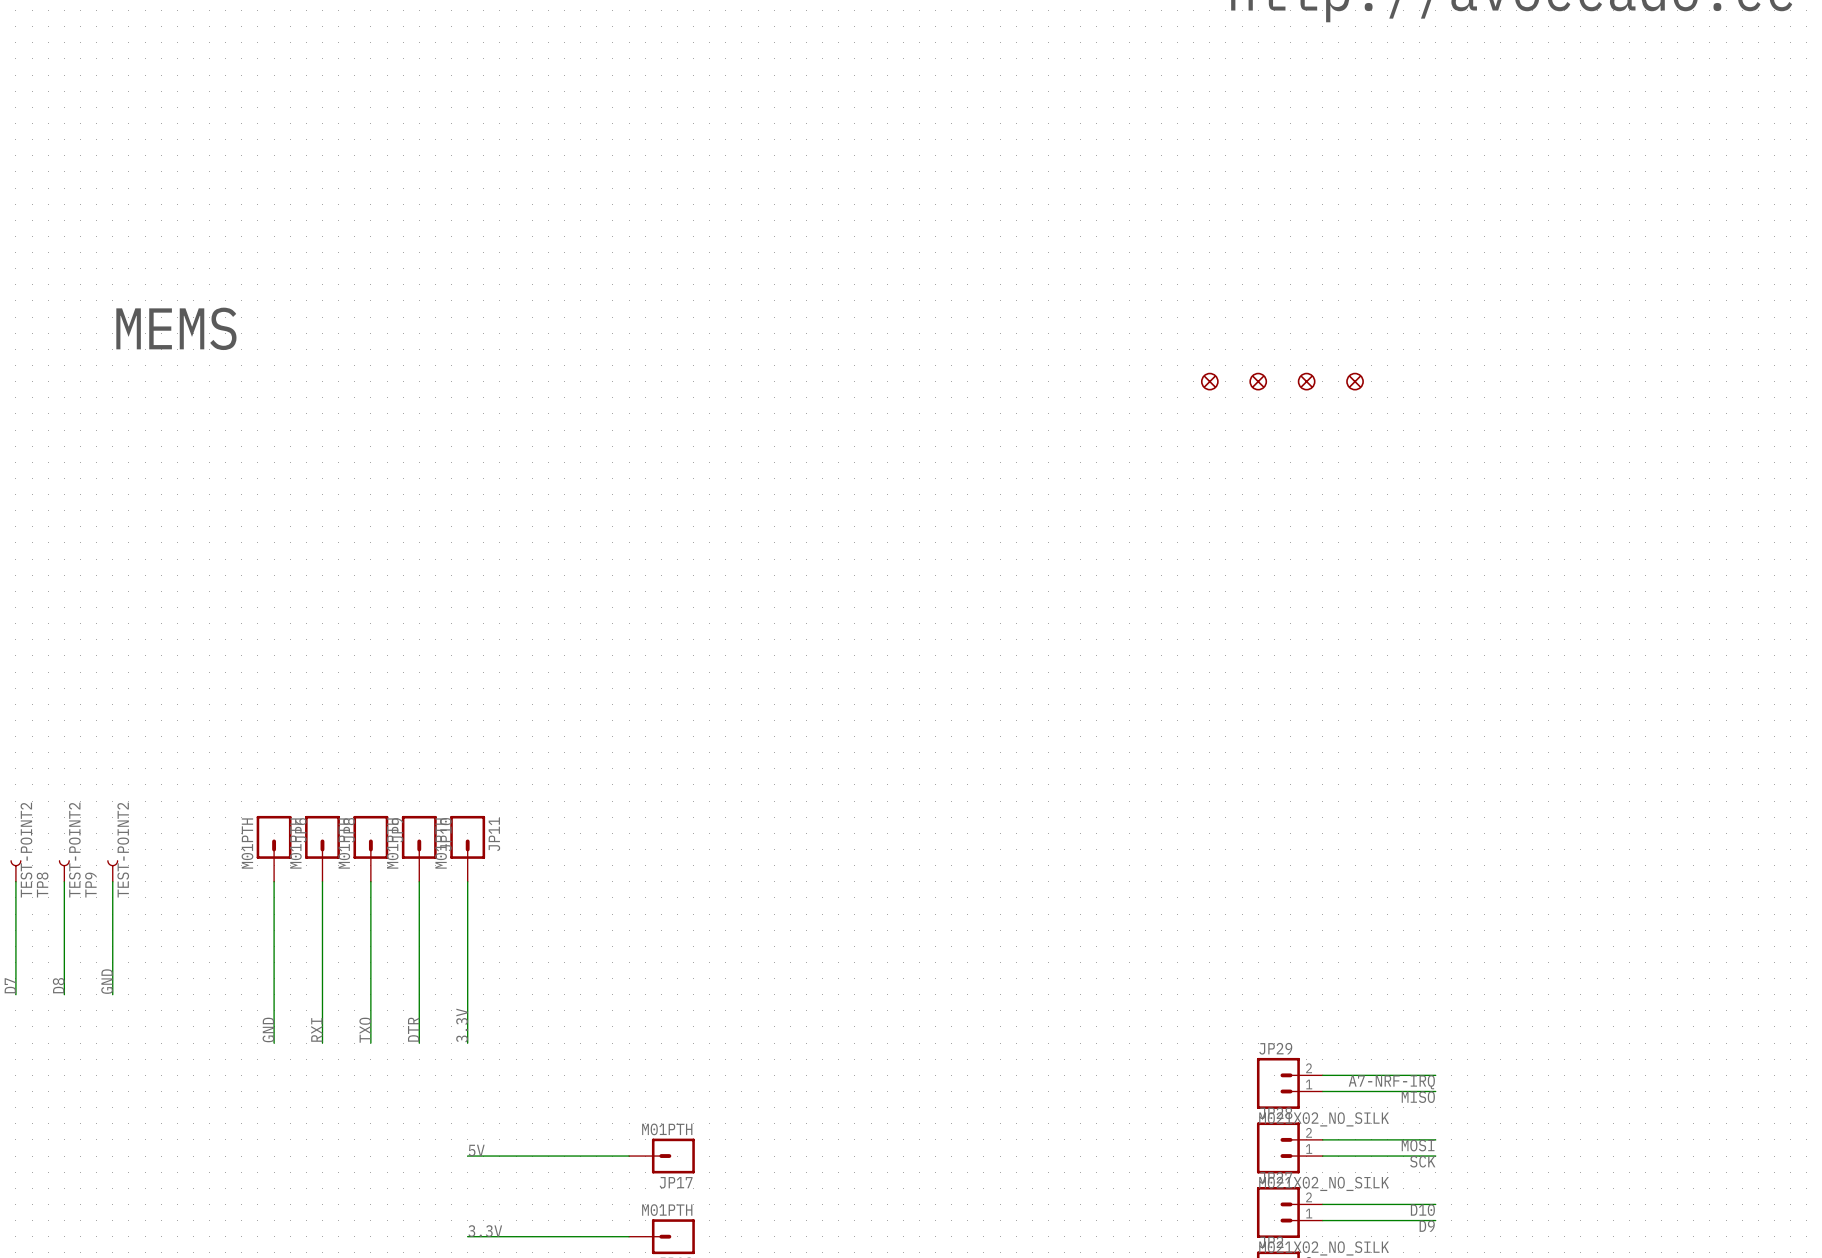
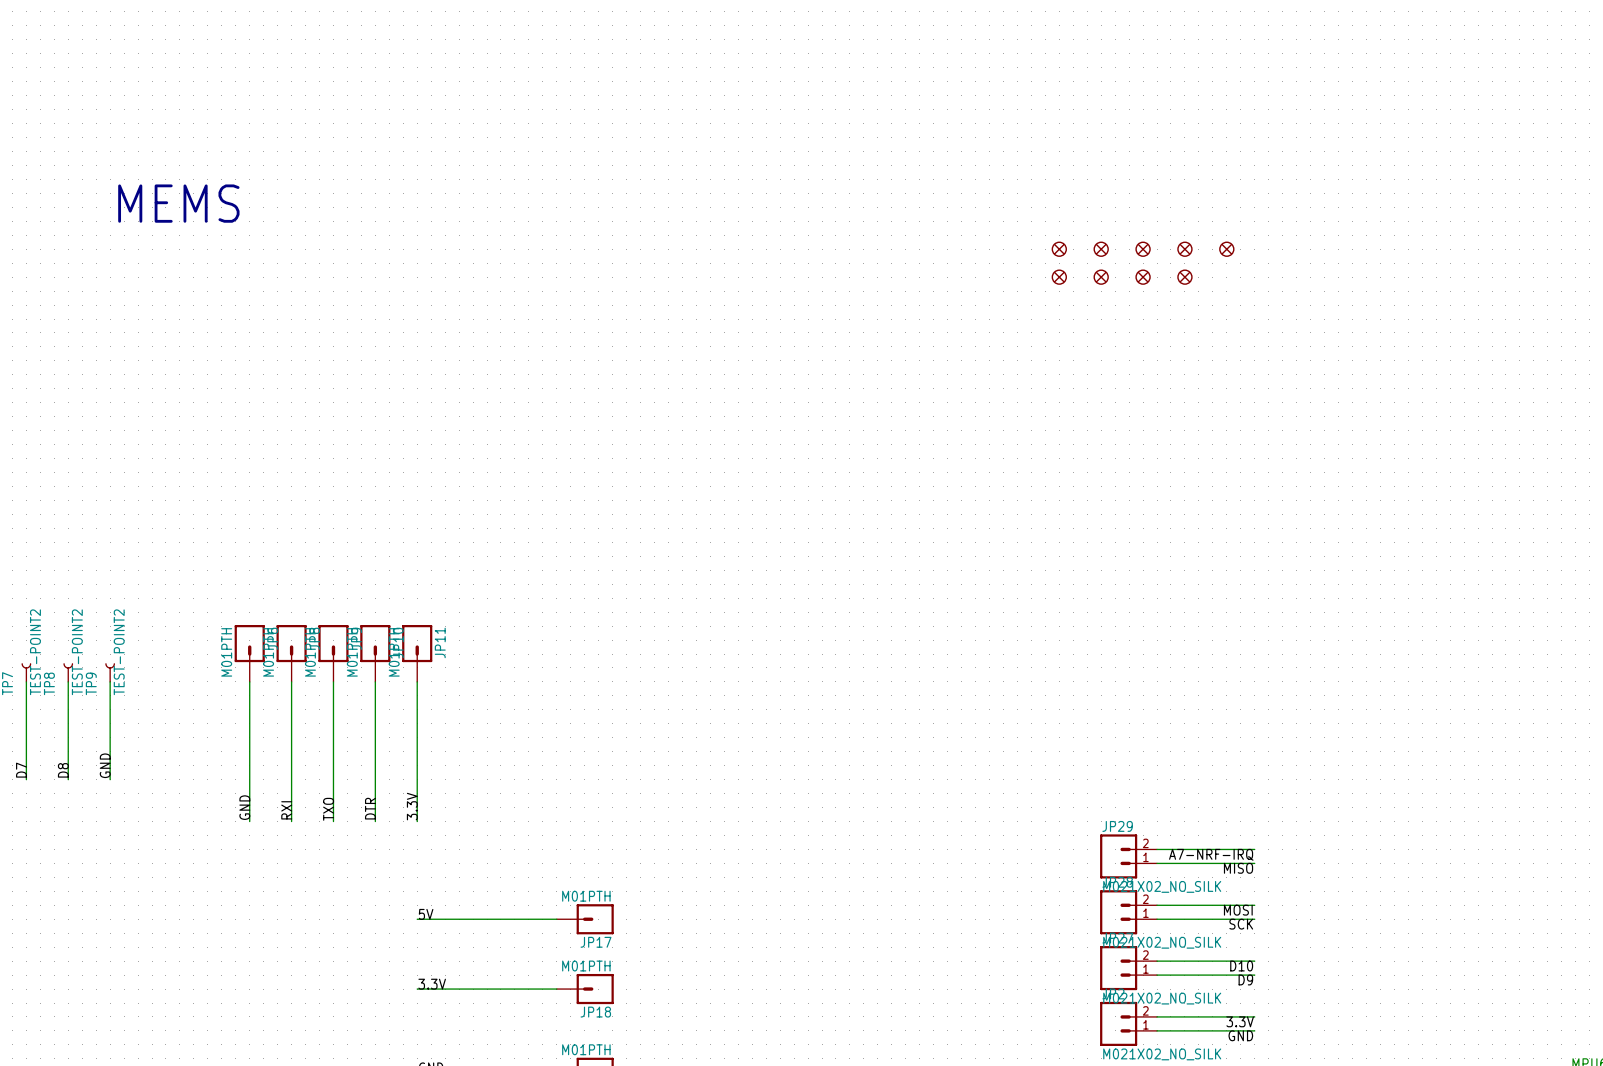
part: none -> (1226, 249)
part: none -> (1059, 277)
part: none -> (1101, 277)
part: none -> (1143, 277)
part: none -> (1184, 277)

